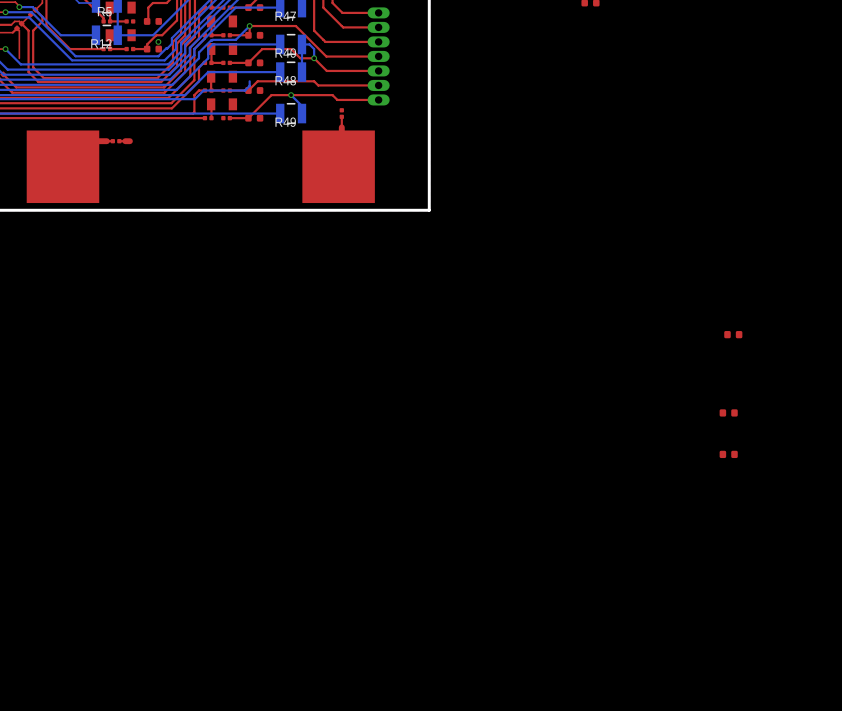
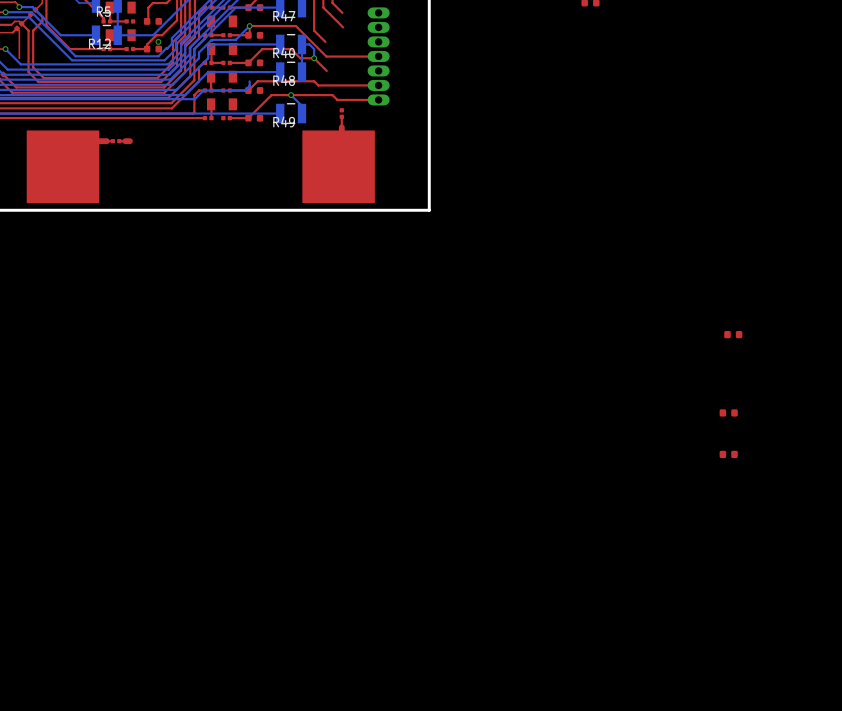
top track: (378, 12) (342, 12) -> none
top track: (378, 27) (343, 27) -> none
top track: (378, 41) (325, 41) -> none
top track: (378, 70) (326, 70) -> none

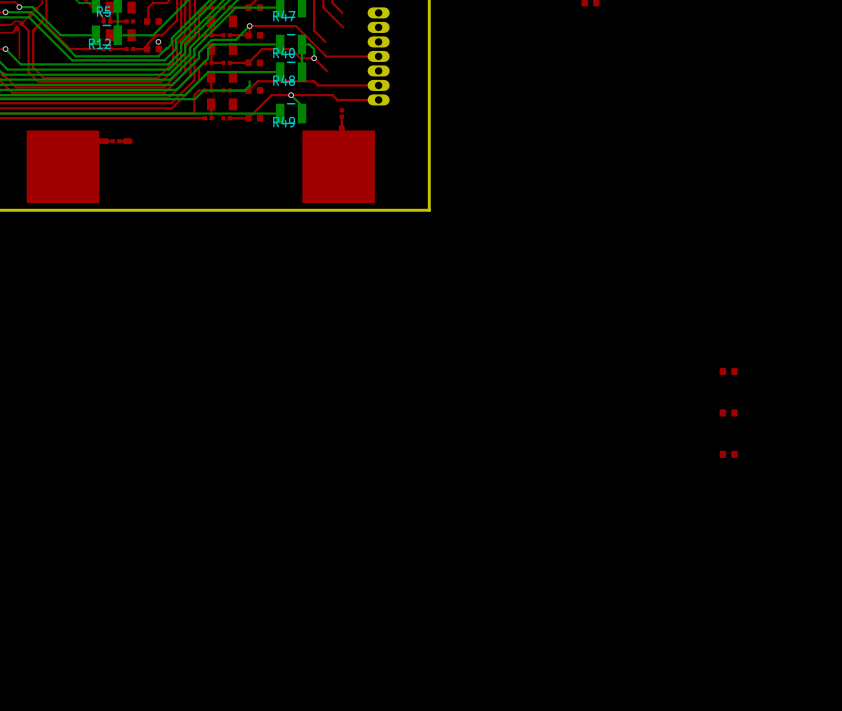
part position: (733, 334) -> (728, 371)

